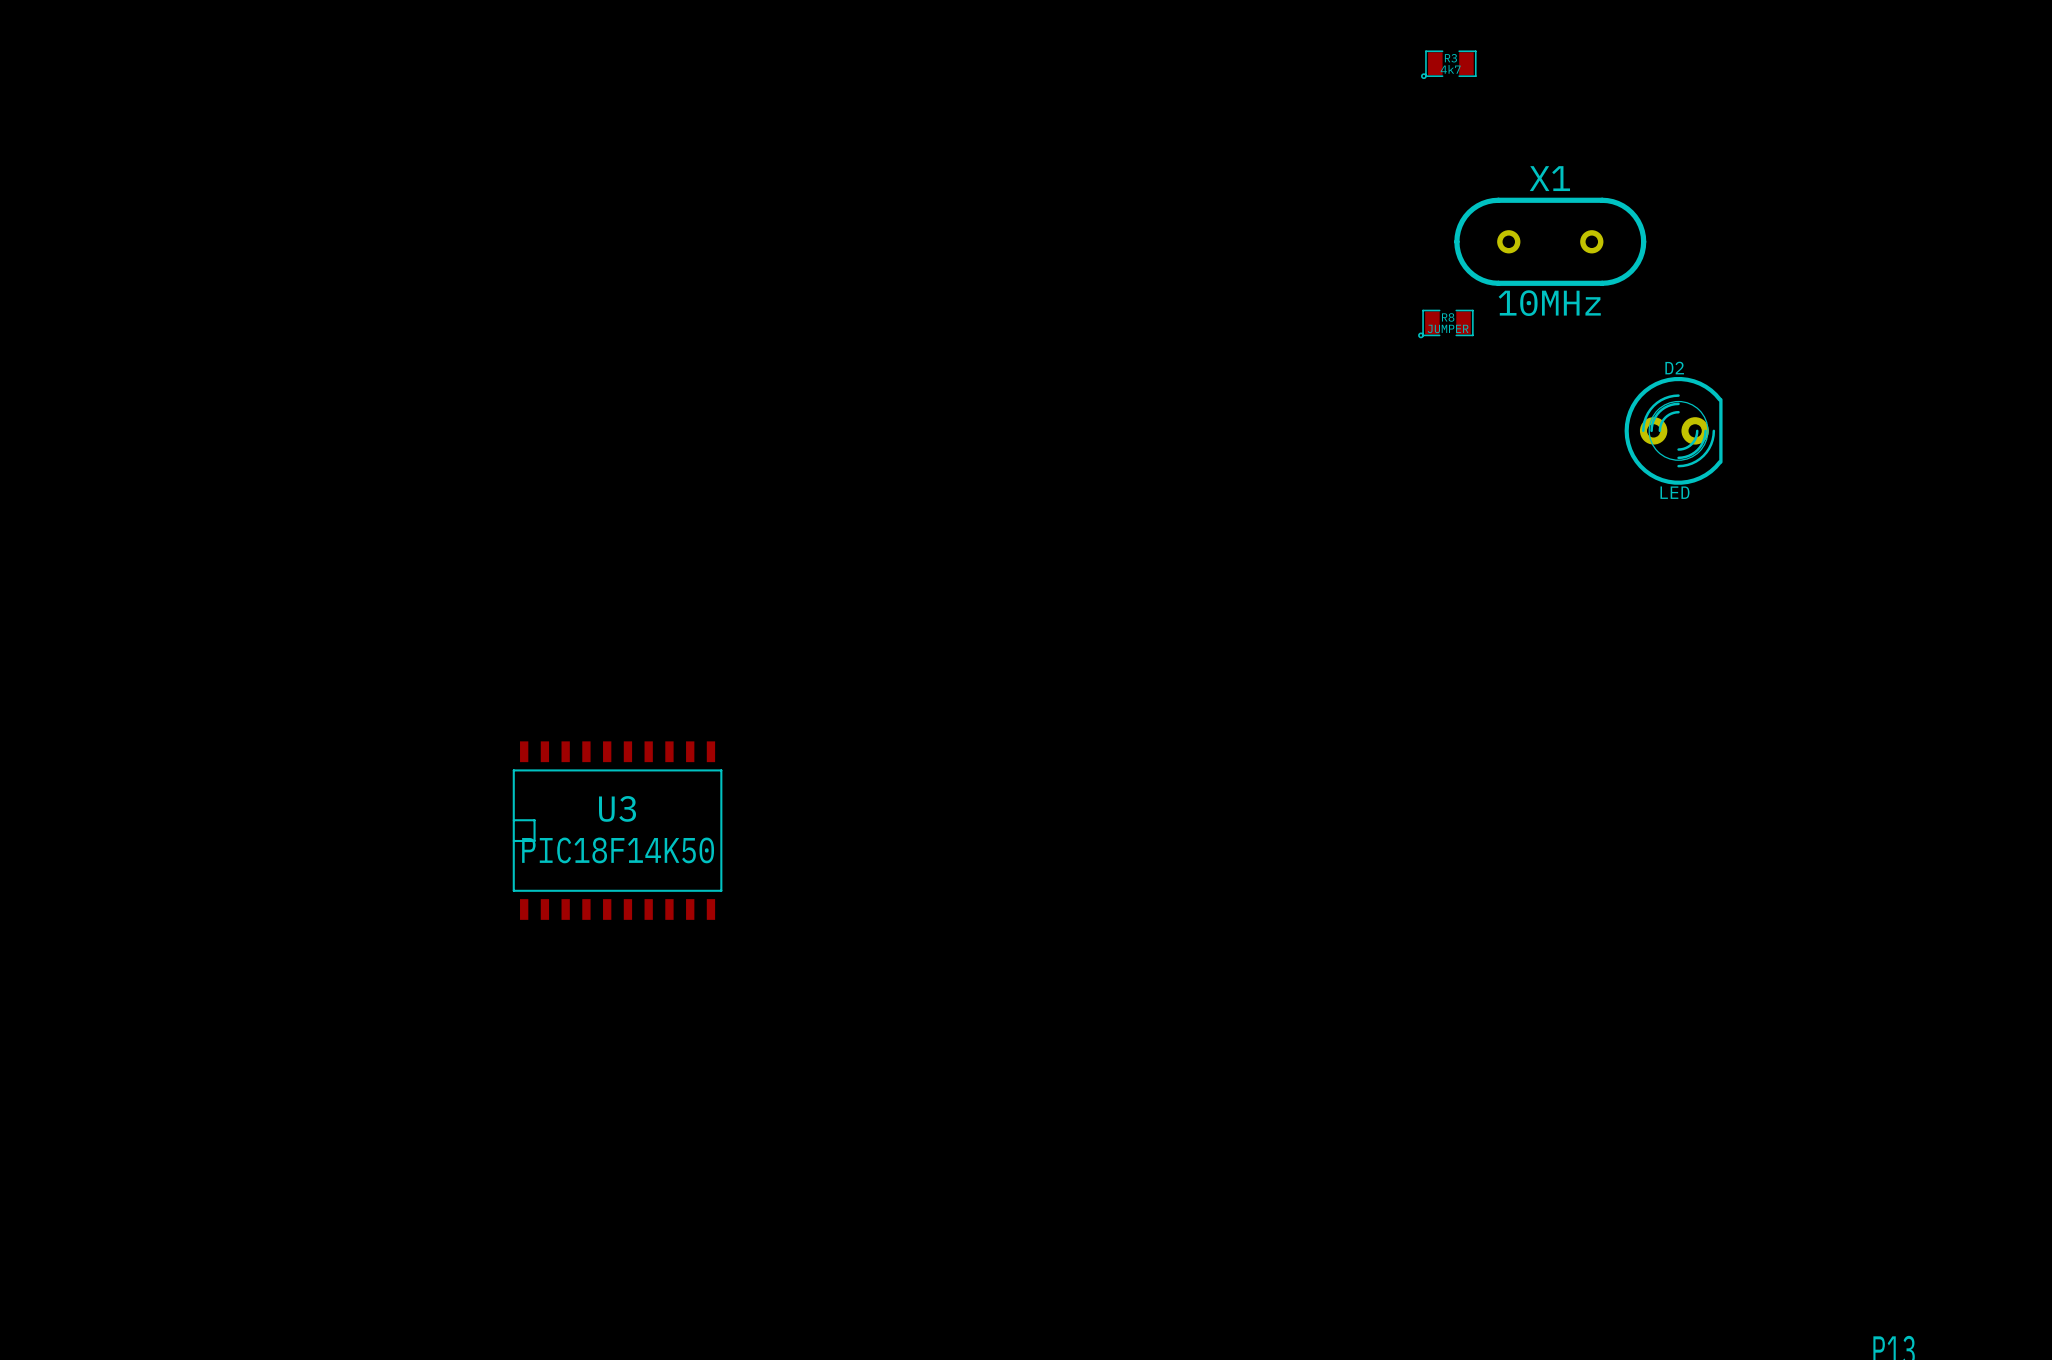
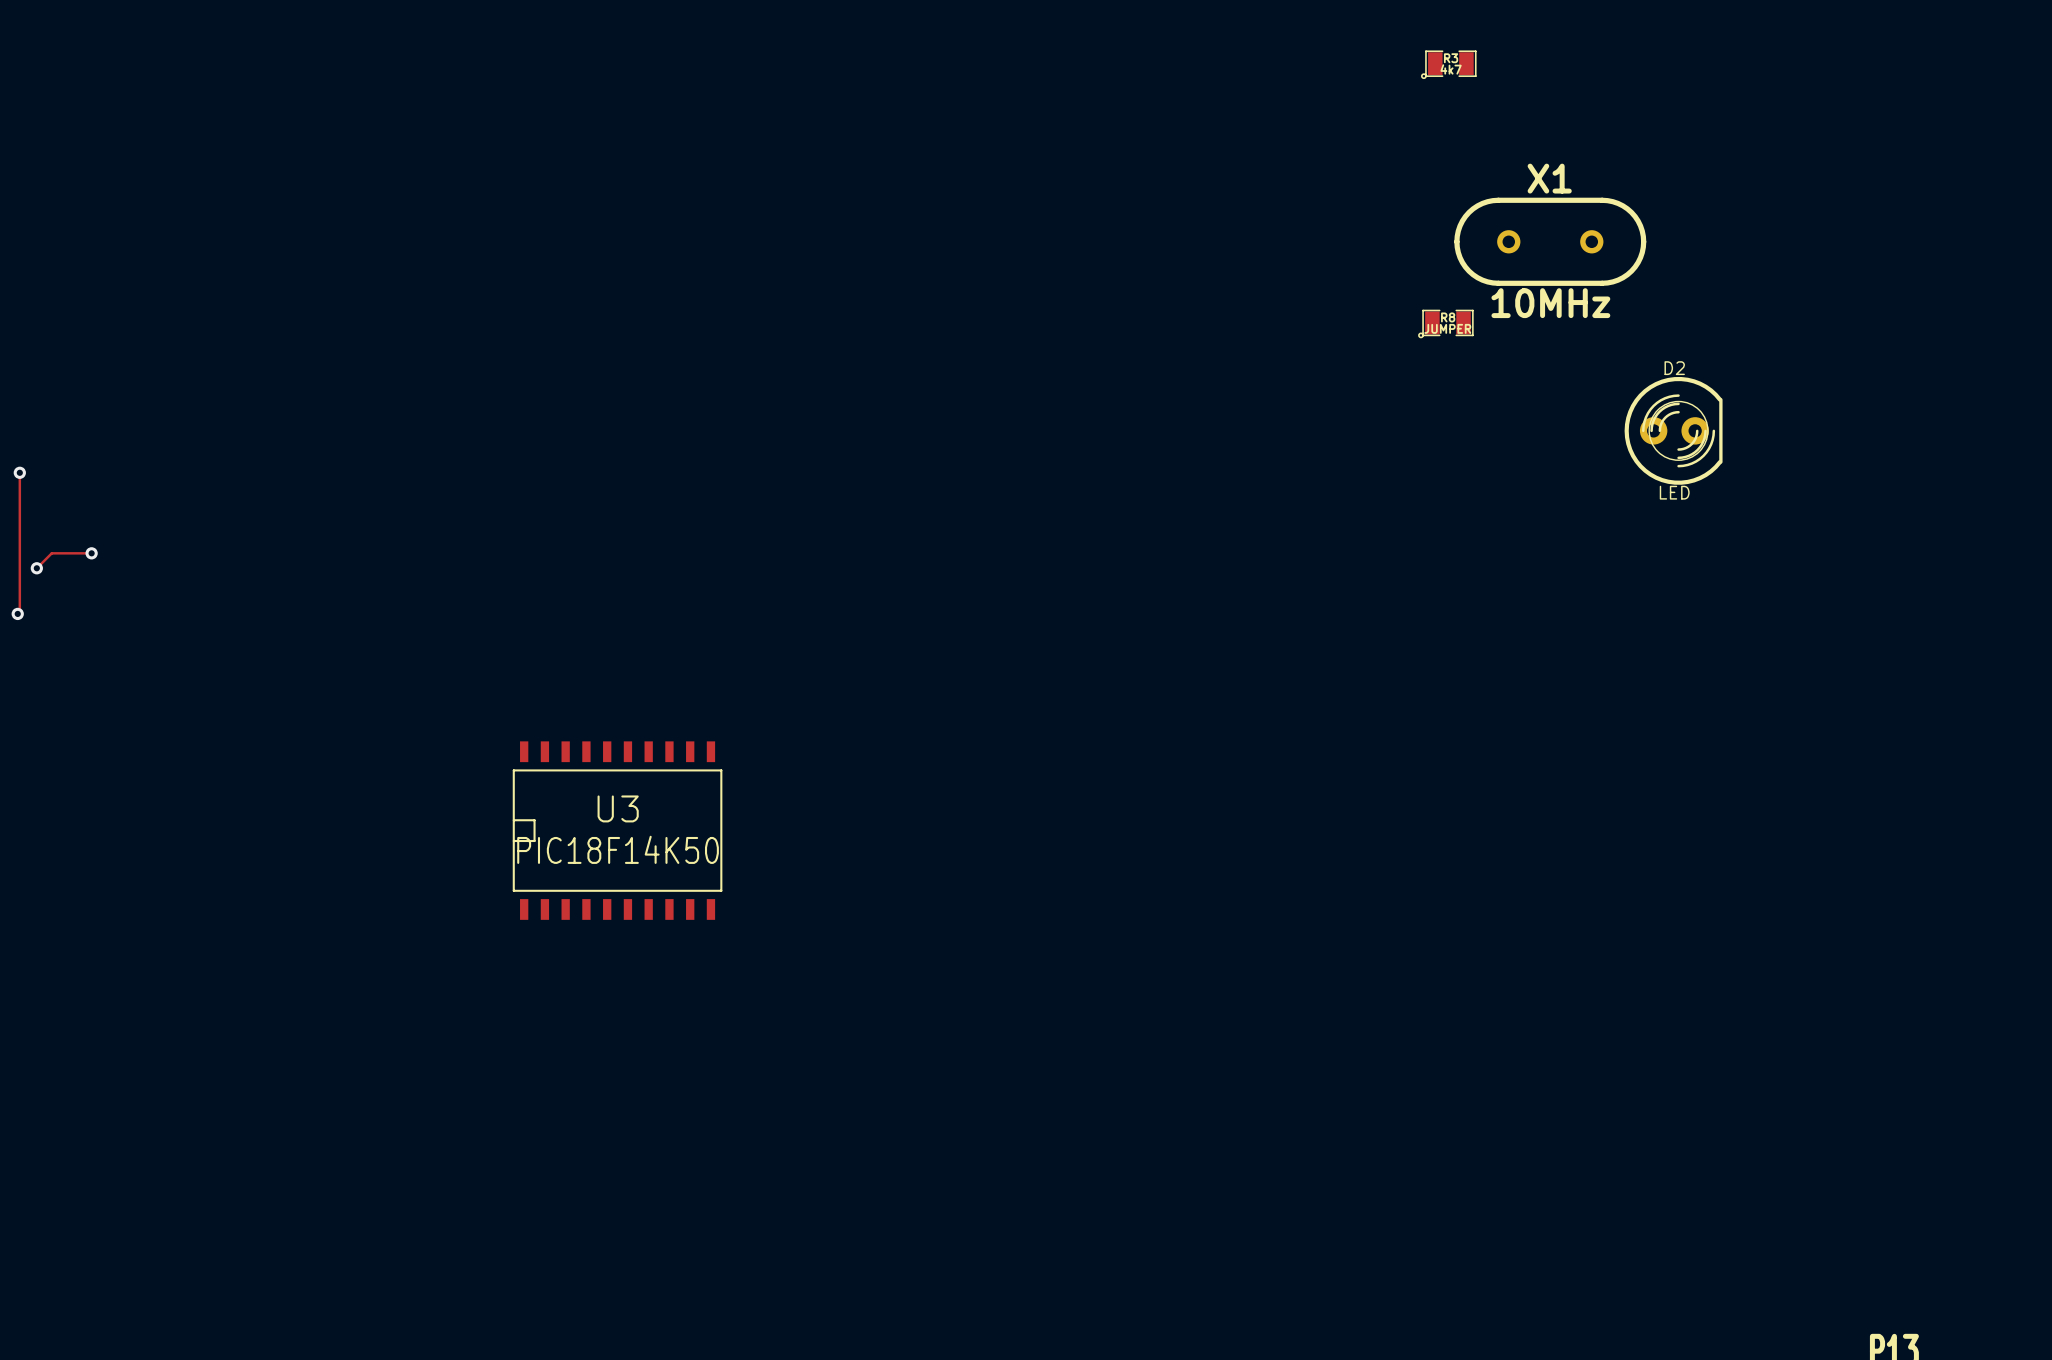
track: none -> (19, 472) (19, 611) (17, 613)
via: none -> (19, 472)
track: none -> (91, 553) (51, 553) (36, 568)
via: none -> (91, 553)
via: none -> (36, 568)
via: none -> (17, 613)

